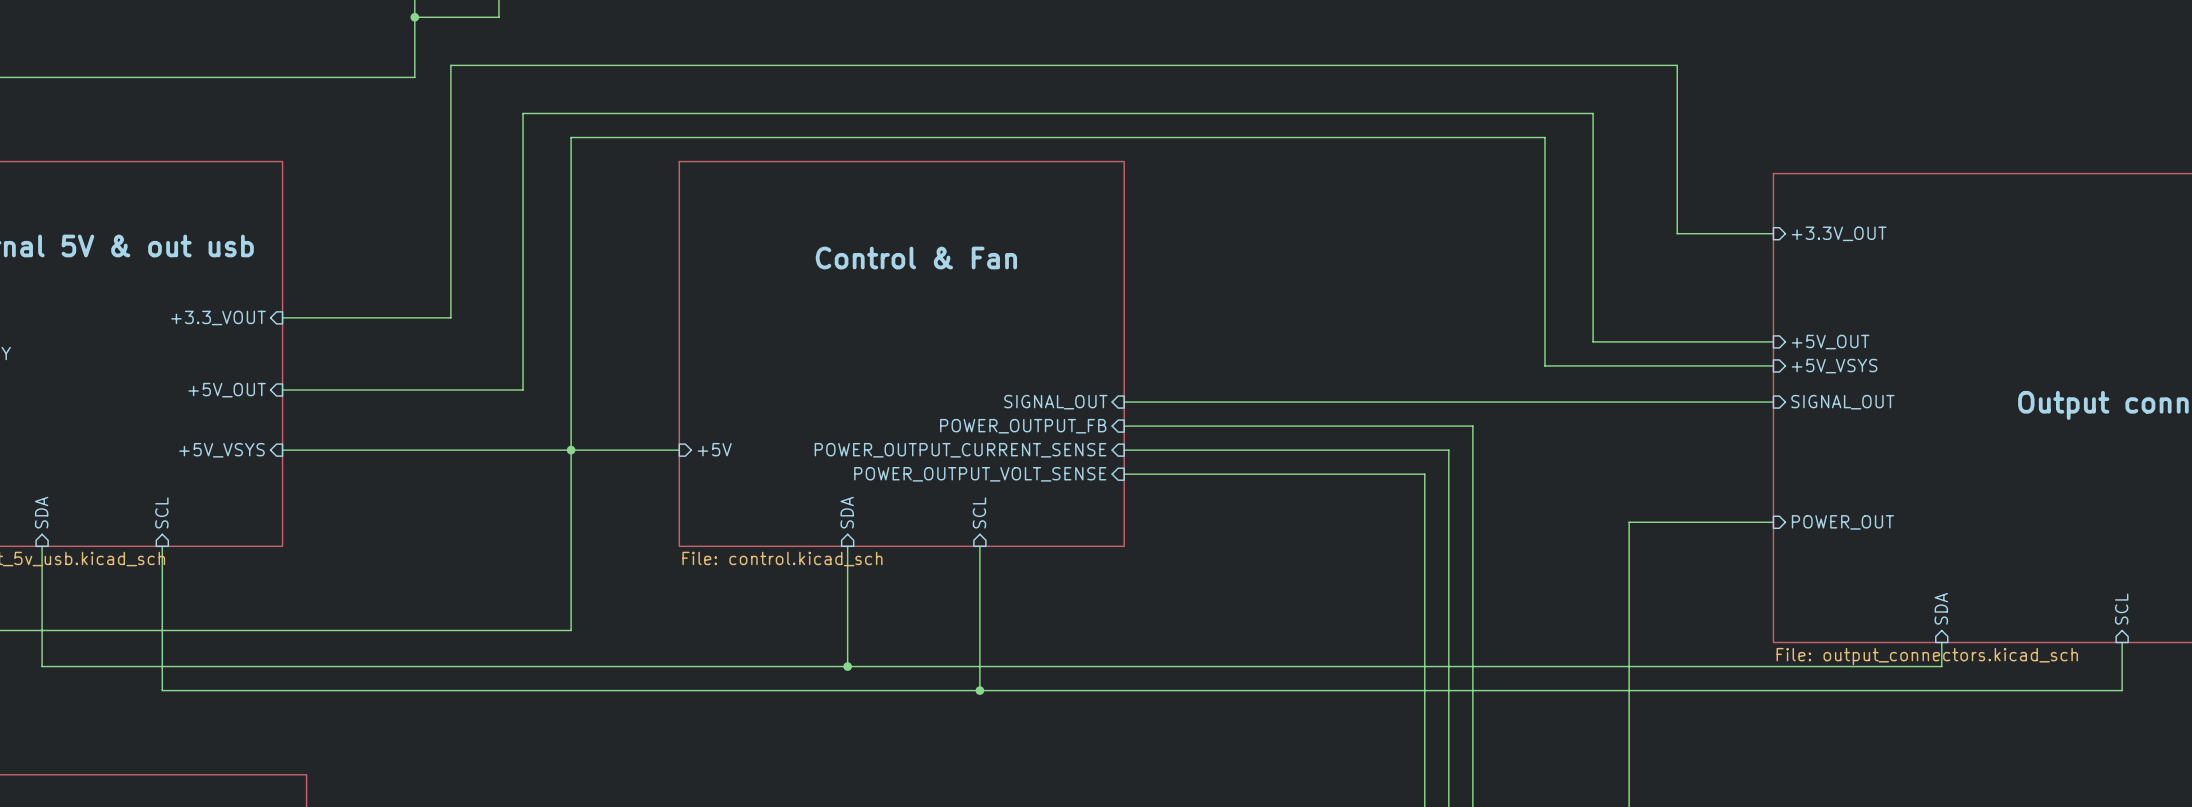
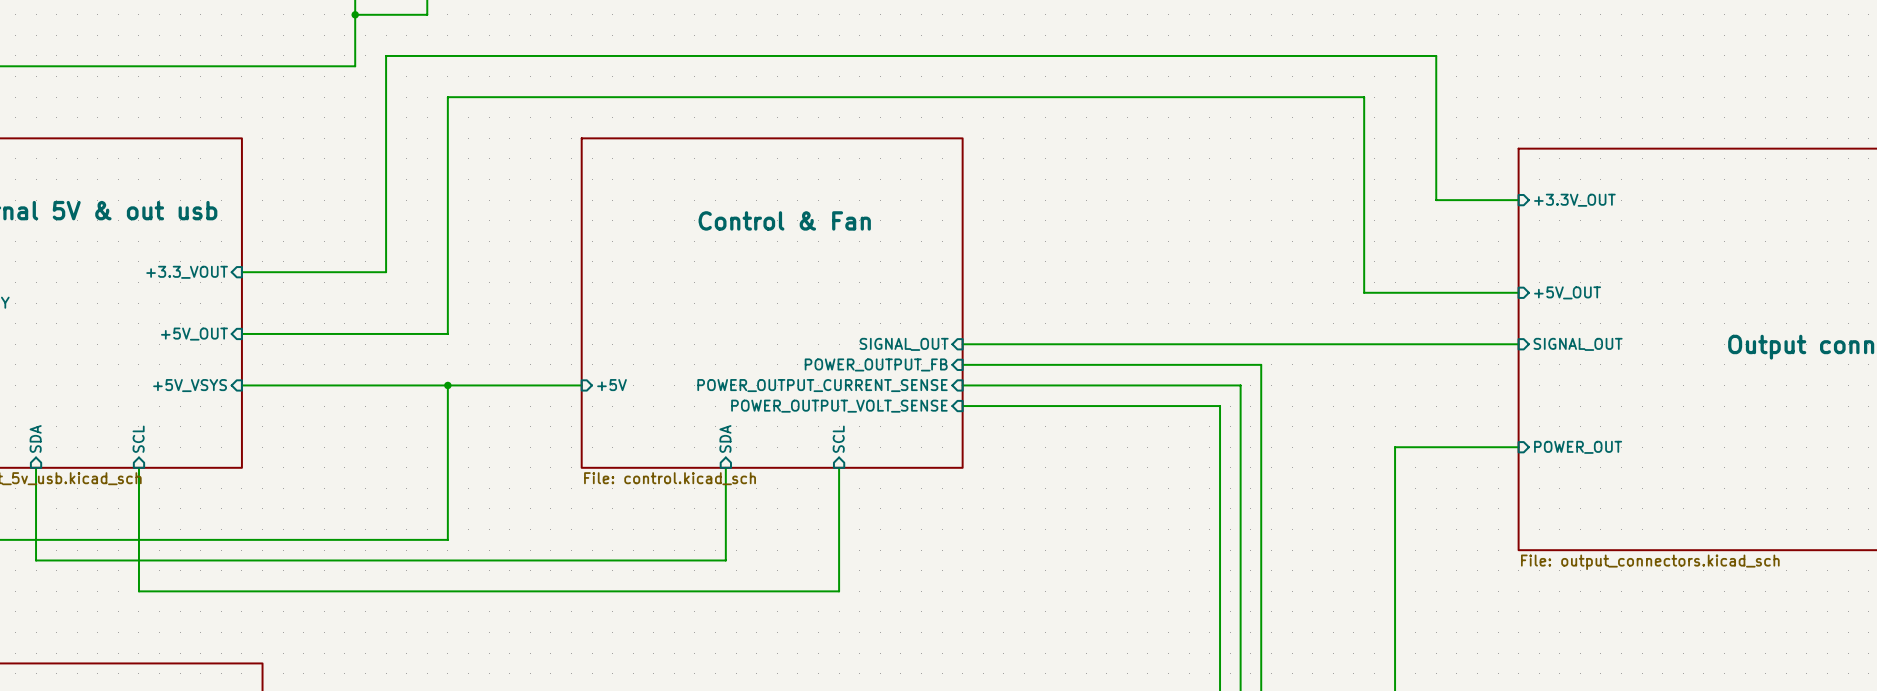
wire: (1773, 365) (1544, 365) (1544, 137) (571, 137) (571, 630) (523, 630) -> (447, 385) (447, 539)
sheet pin: +5V_VSYS (1834, 366) -> none
junction position: (571, 450) -> (447, 385)
sheet pin: SDA (1941, 608) -> none
sheet pin: SCL (2121, 609) -> none
wire: (1941, 642) (1941, 666) (42, 666) (42, 654) -> none
wire: (2122, 642) (2122, 690) (979, 690) -> none
wire: (847, 654) (847, 666) -> (725, 560) (36, 560)
junction: (847, 666) -> none
junction: (979, 690) -> none

